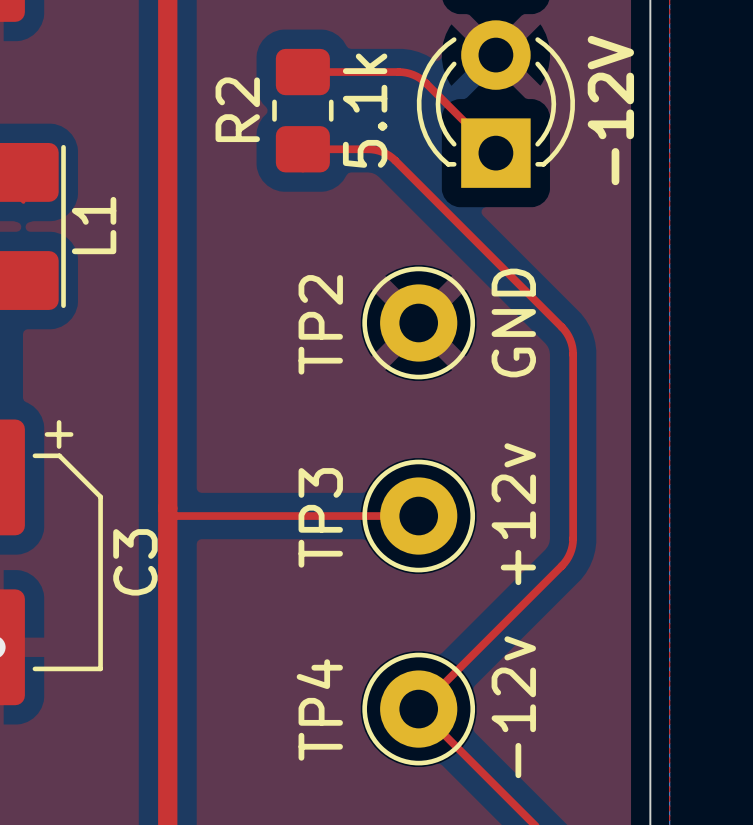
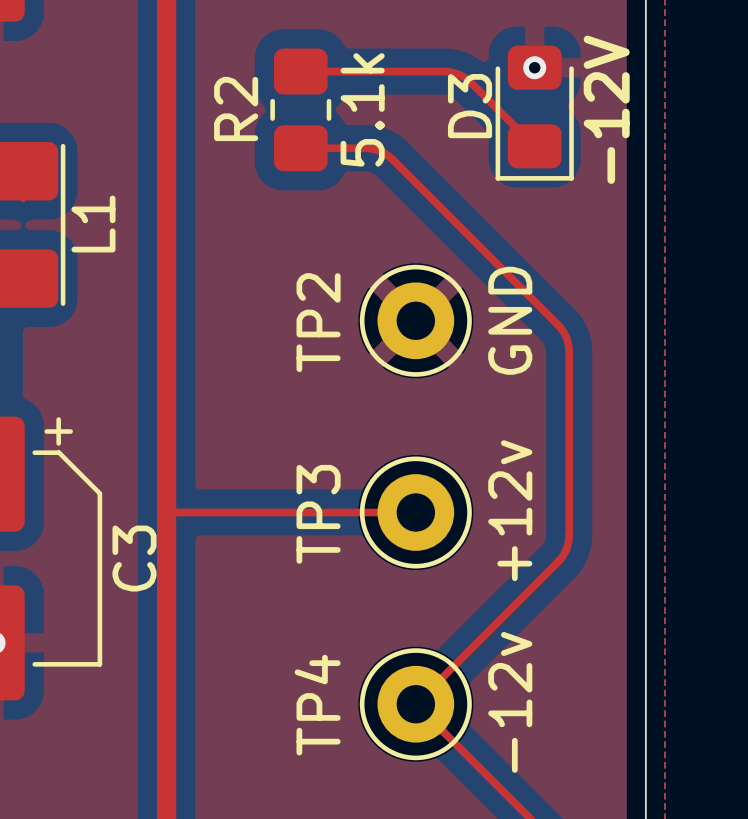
via: none -> (534, 67)
top track: (398, 72) (410, 73) (423, 80) (495, 153) -> (396, 71) (447, 71) (462, 76) (534, 146)
part: (495, 104) -> none
D3: none -> (534, 113)

